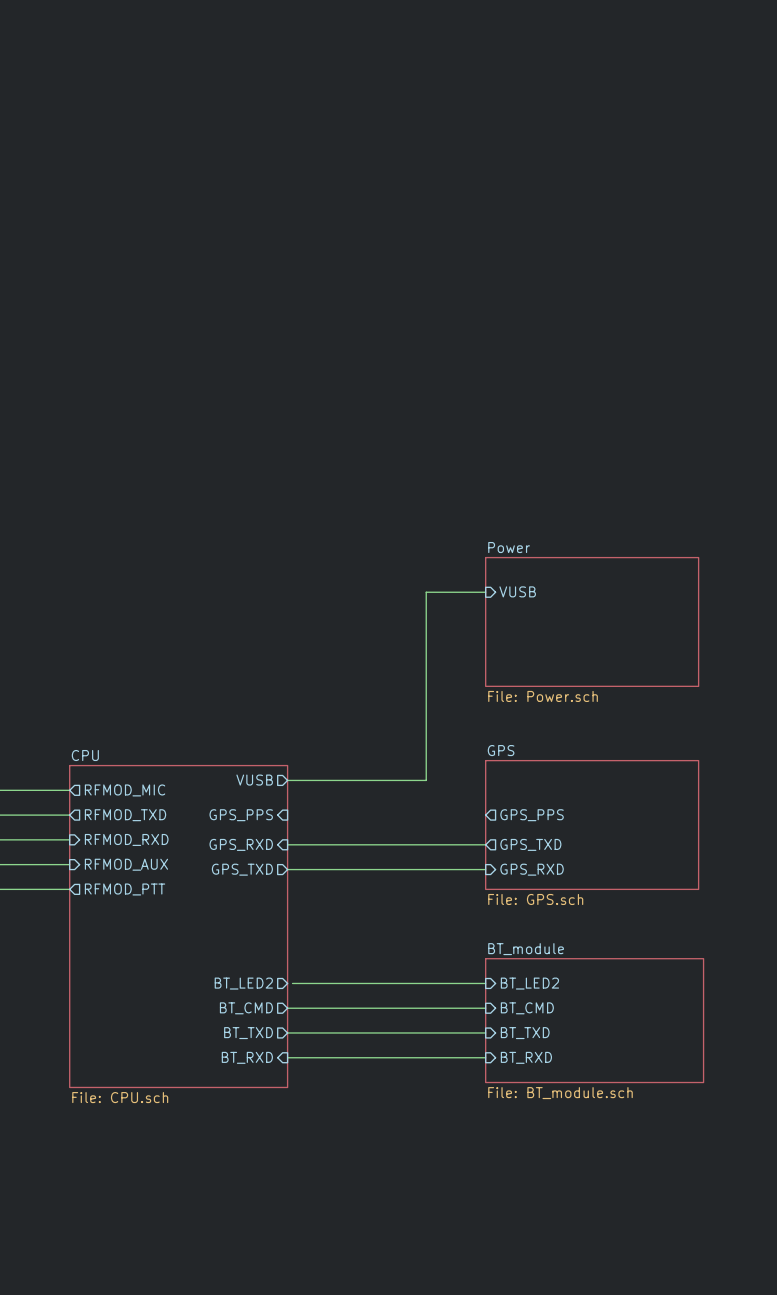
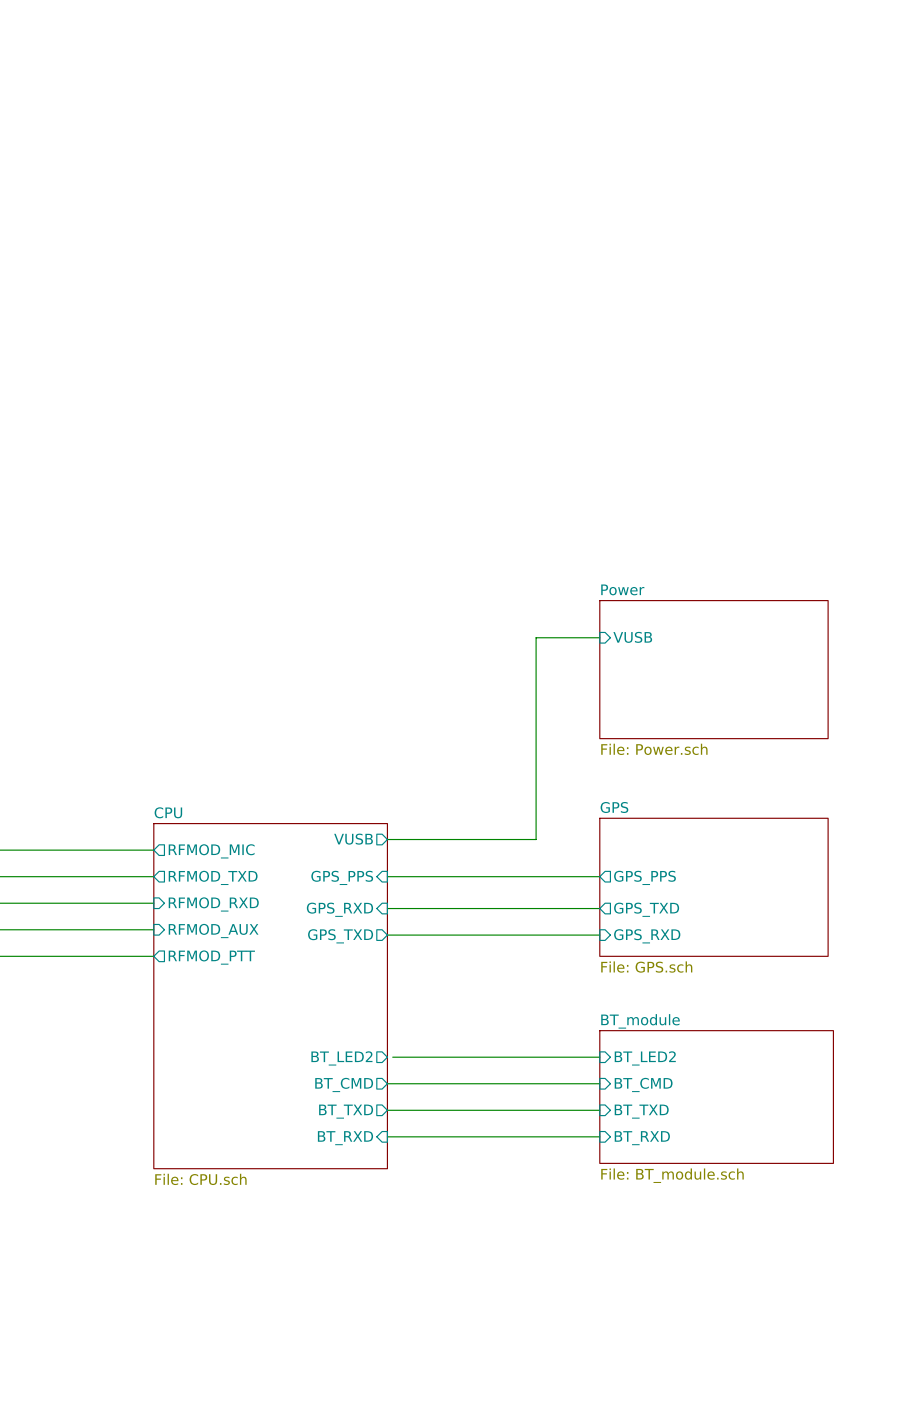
wire: none -> (387, 876) (599, 876)

